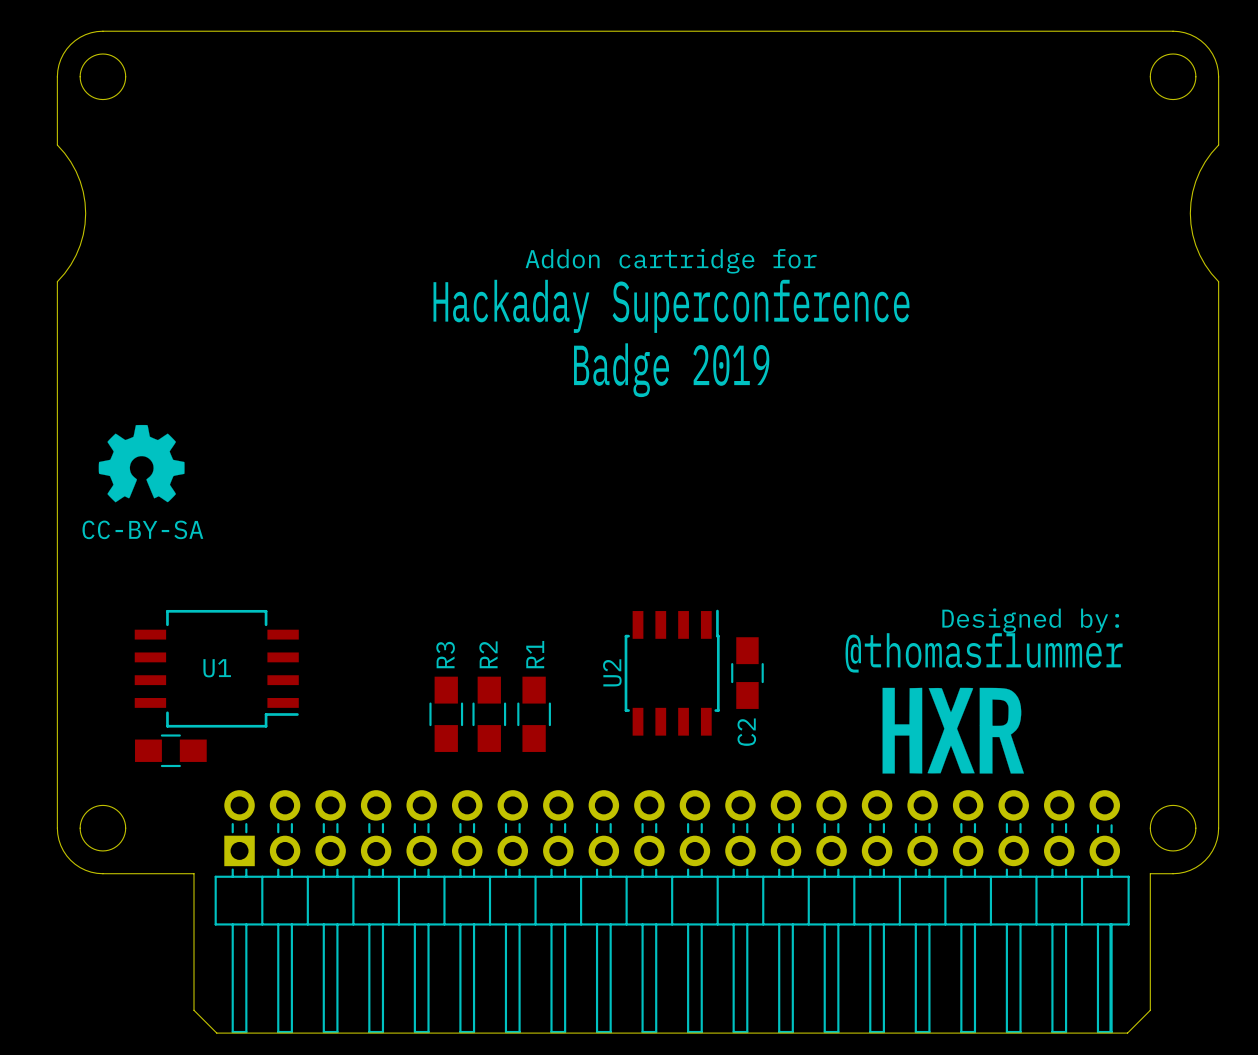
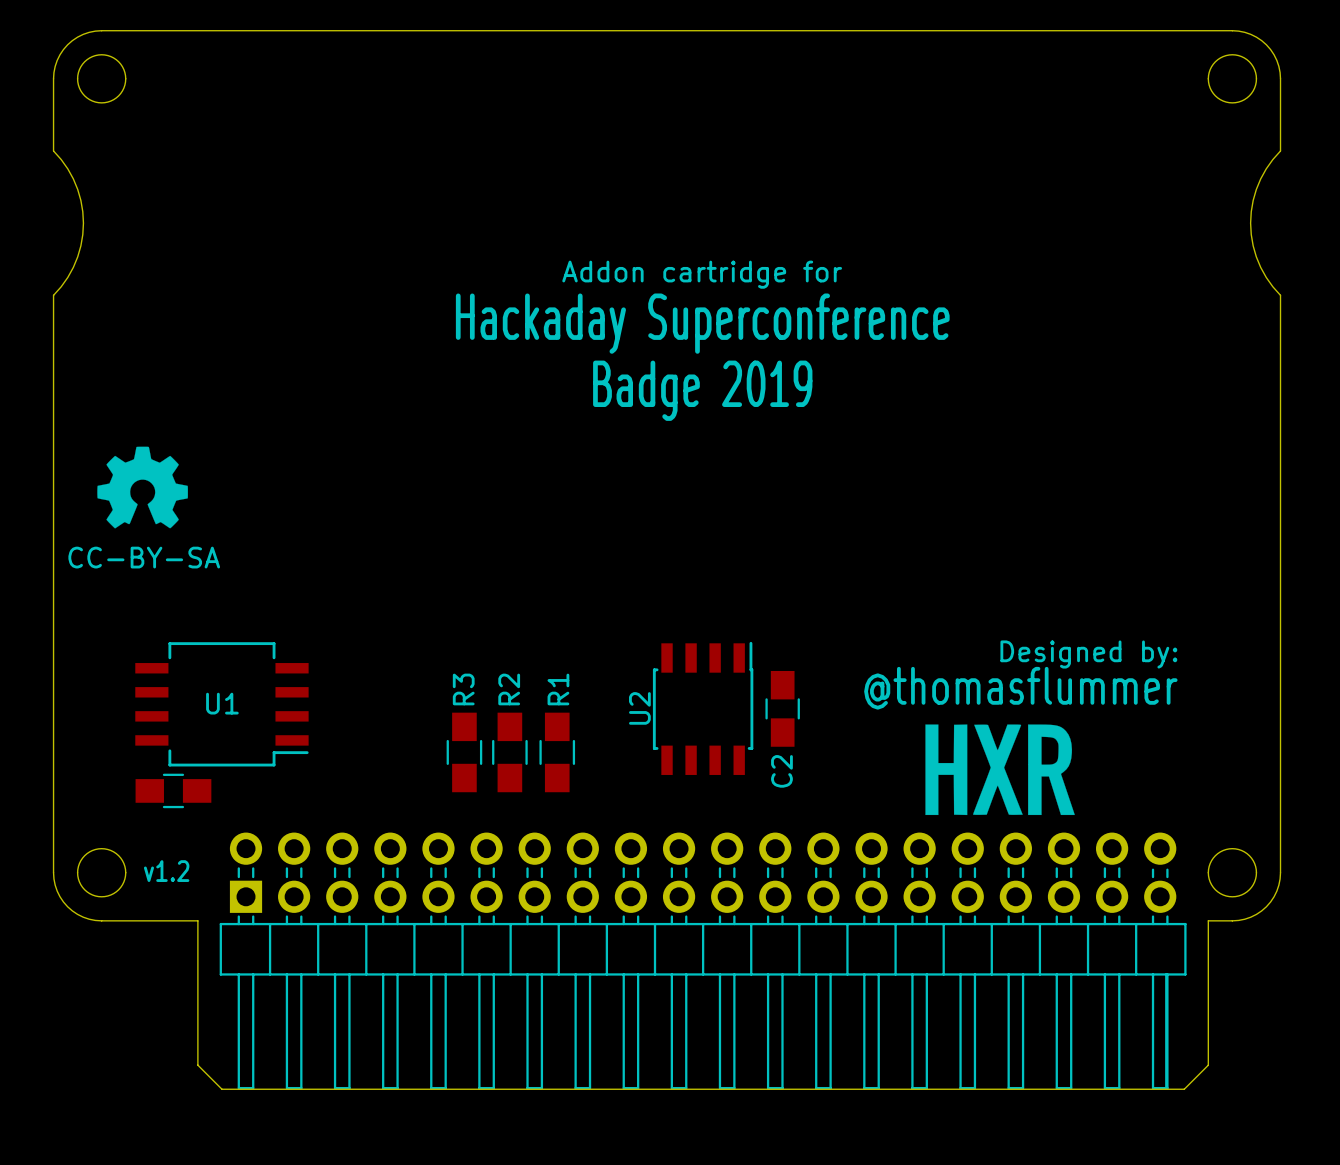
text: none -> v1.2 (166, 871)

